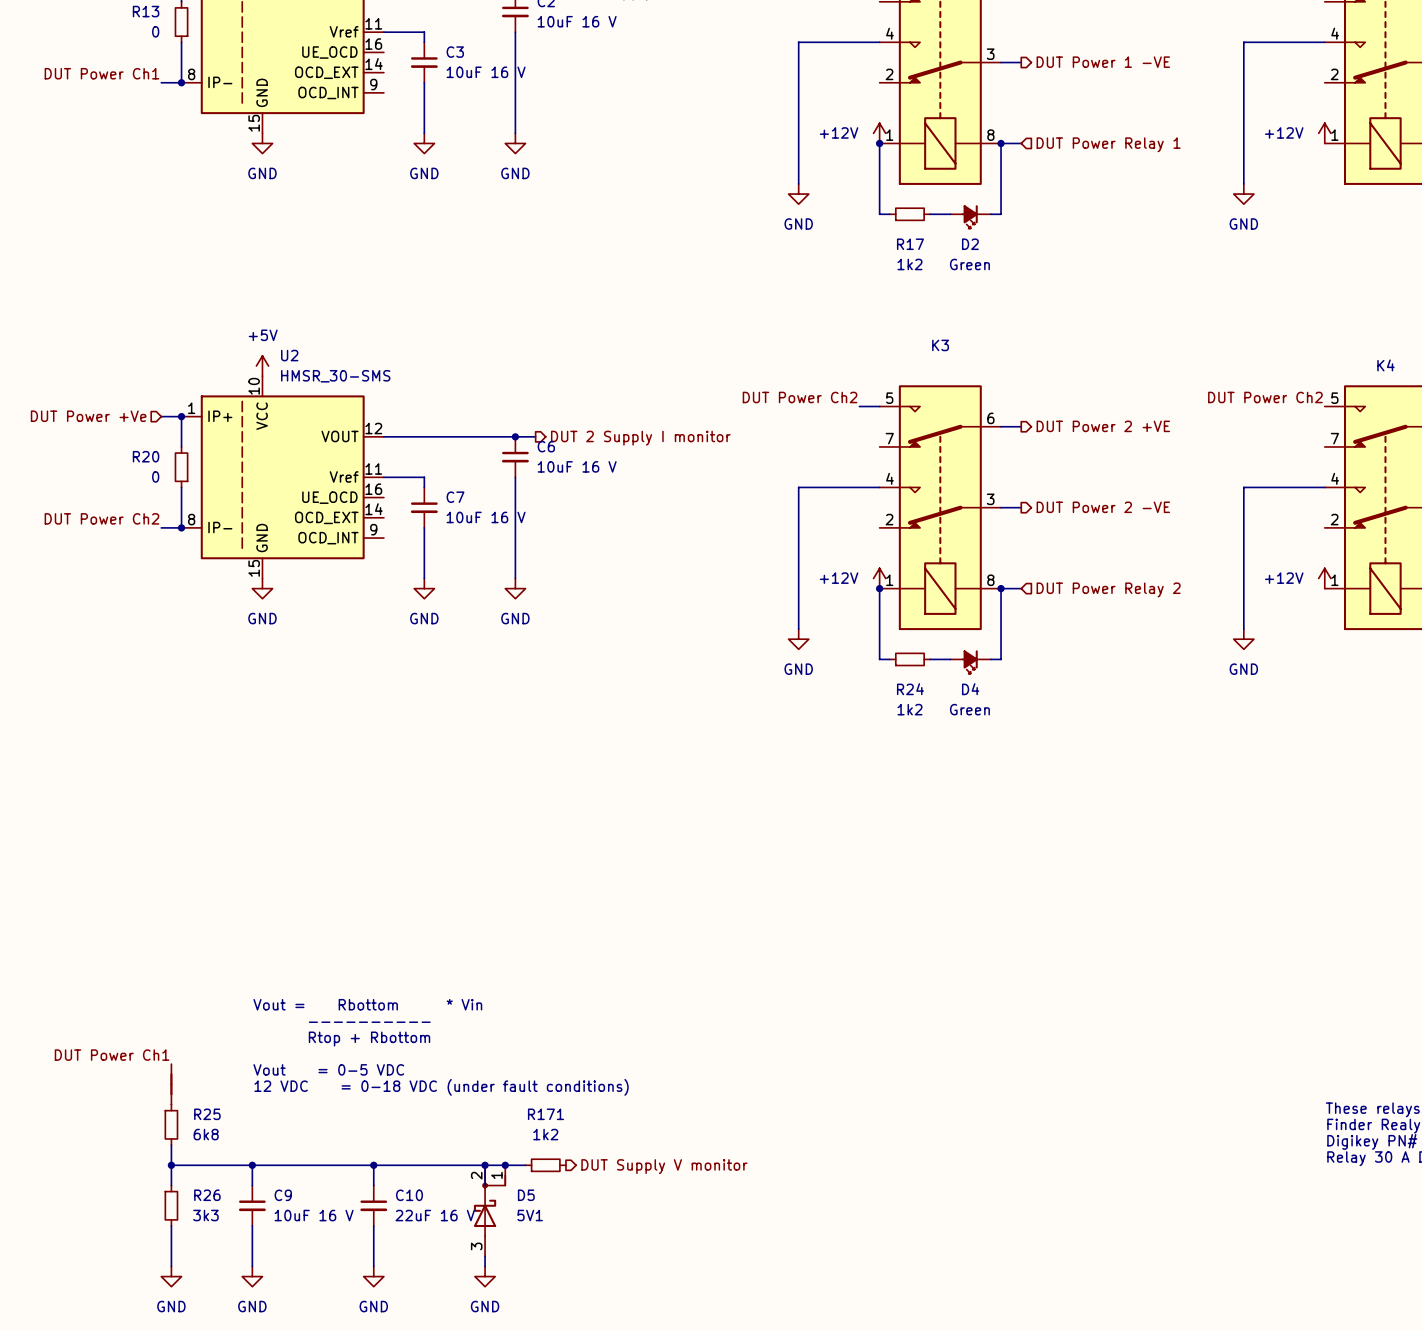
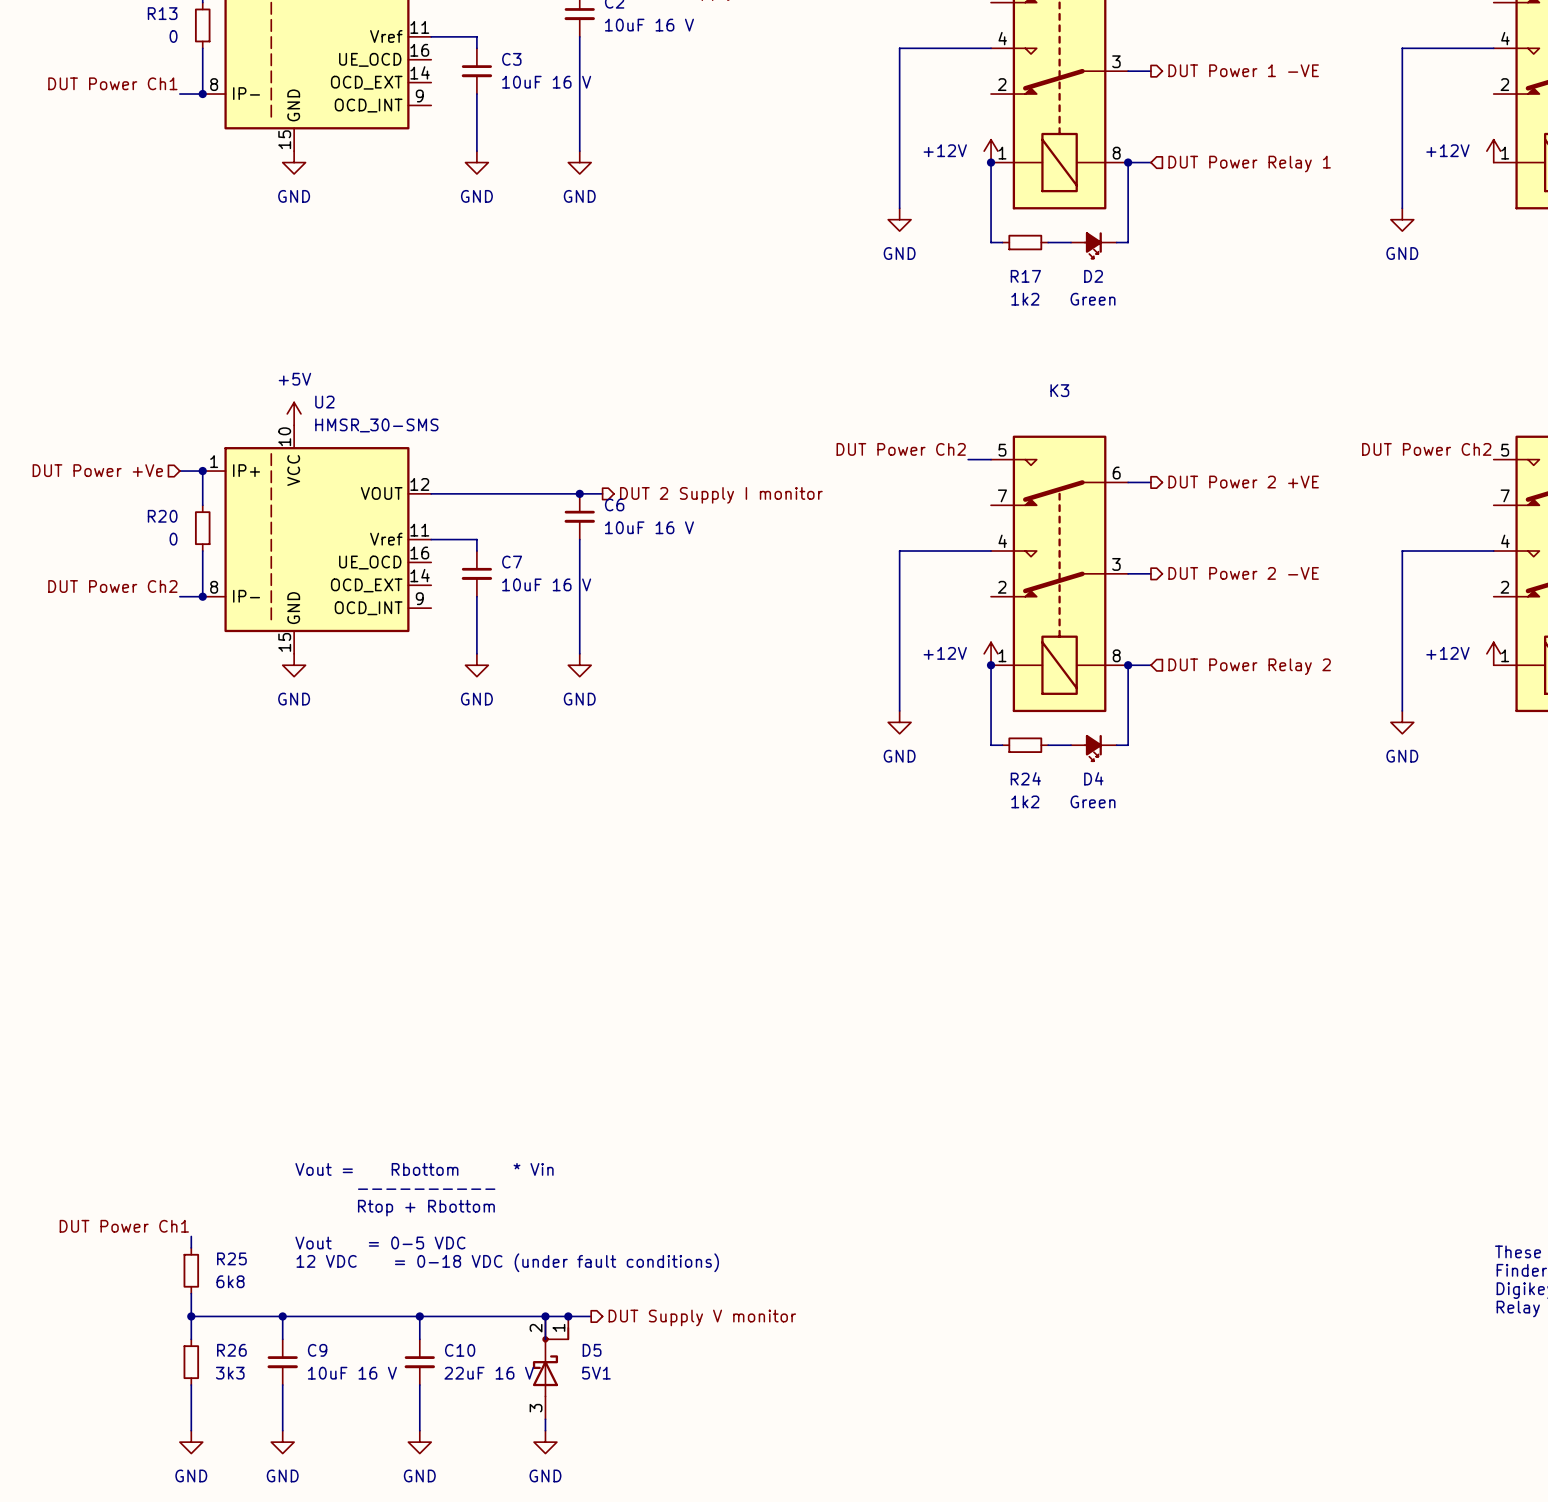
text position: Vout = Rbottom * Vin (367, 1004) -> Vout = Rbottom * Vin (424, 1169)
text position: ---------- (369, 1022) -> ---------- (426, 1189)
text position: Rtop + Rbottom (369, 1039) -> Rtop + Rbottom (426, 1208)
label position: DUT Power Ch1 (112, 1055) -> DUT Power Ch1 (124, 1226)
text position: Vout = 0-5 VDC (328, 1069) -> Vout = 0-5 VDC (380, 1243)
part: (171, 1084) -> none
text position: 12 VDC = 0-18 VDC (under fault conditions) (441, 1087) -> 12 VDC = 0-18 VDC (under fault conditions) (507, 1262)
R171: 1k2 (545, 1165) -> none
hierarchical label position: DUT Supply V monitor (664, 1166) -> DUT Supply V monitor (702, 1317)

